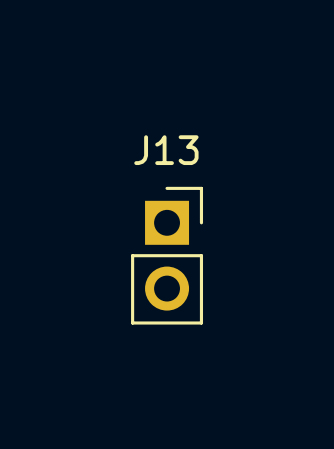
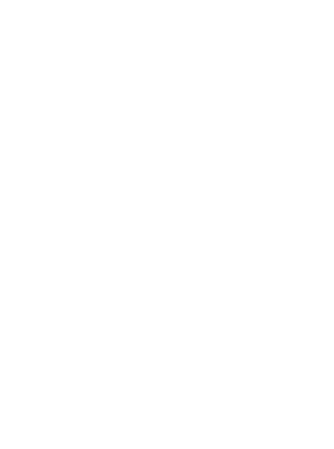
J13: (167, 255) -> none

